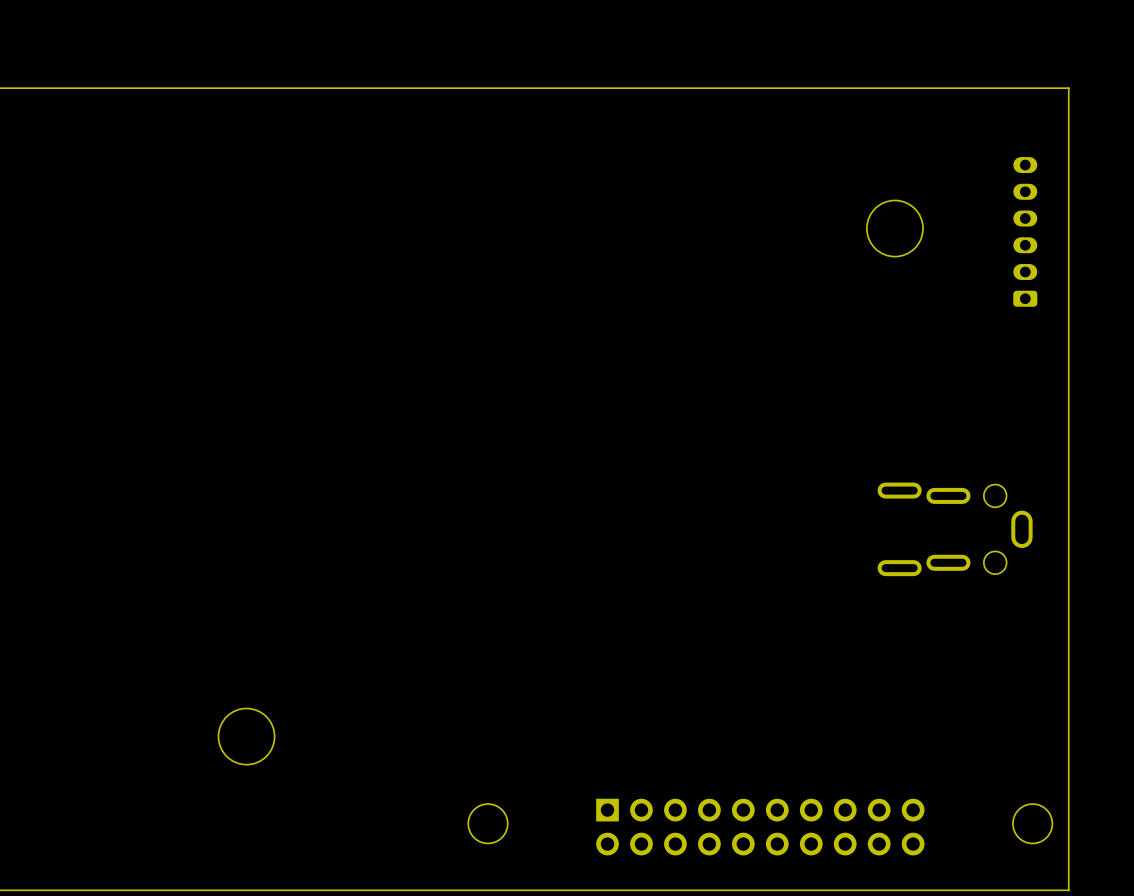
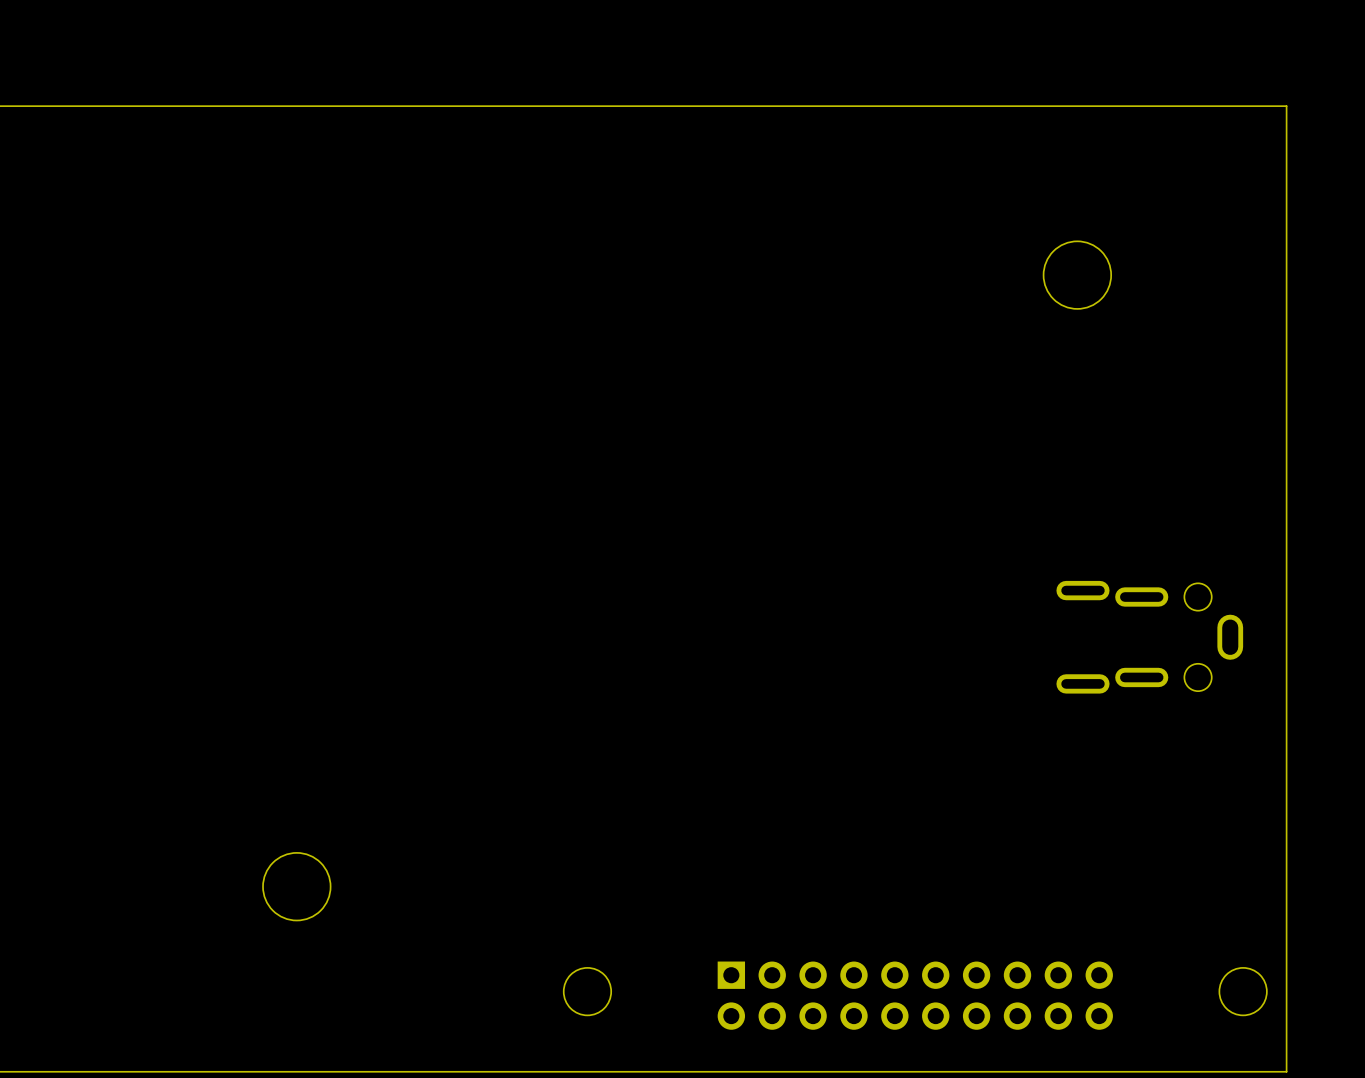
part: (1025, 231) -> none

